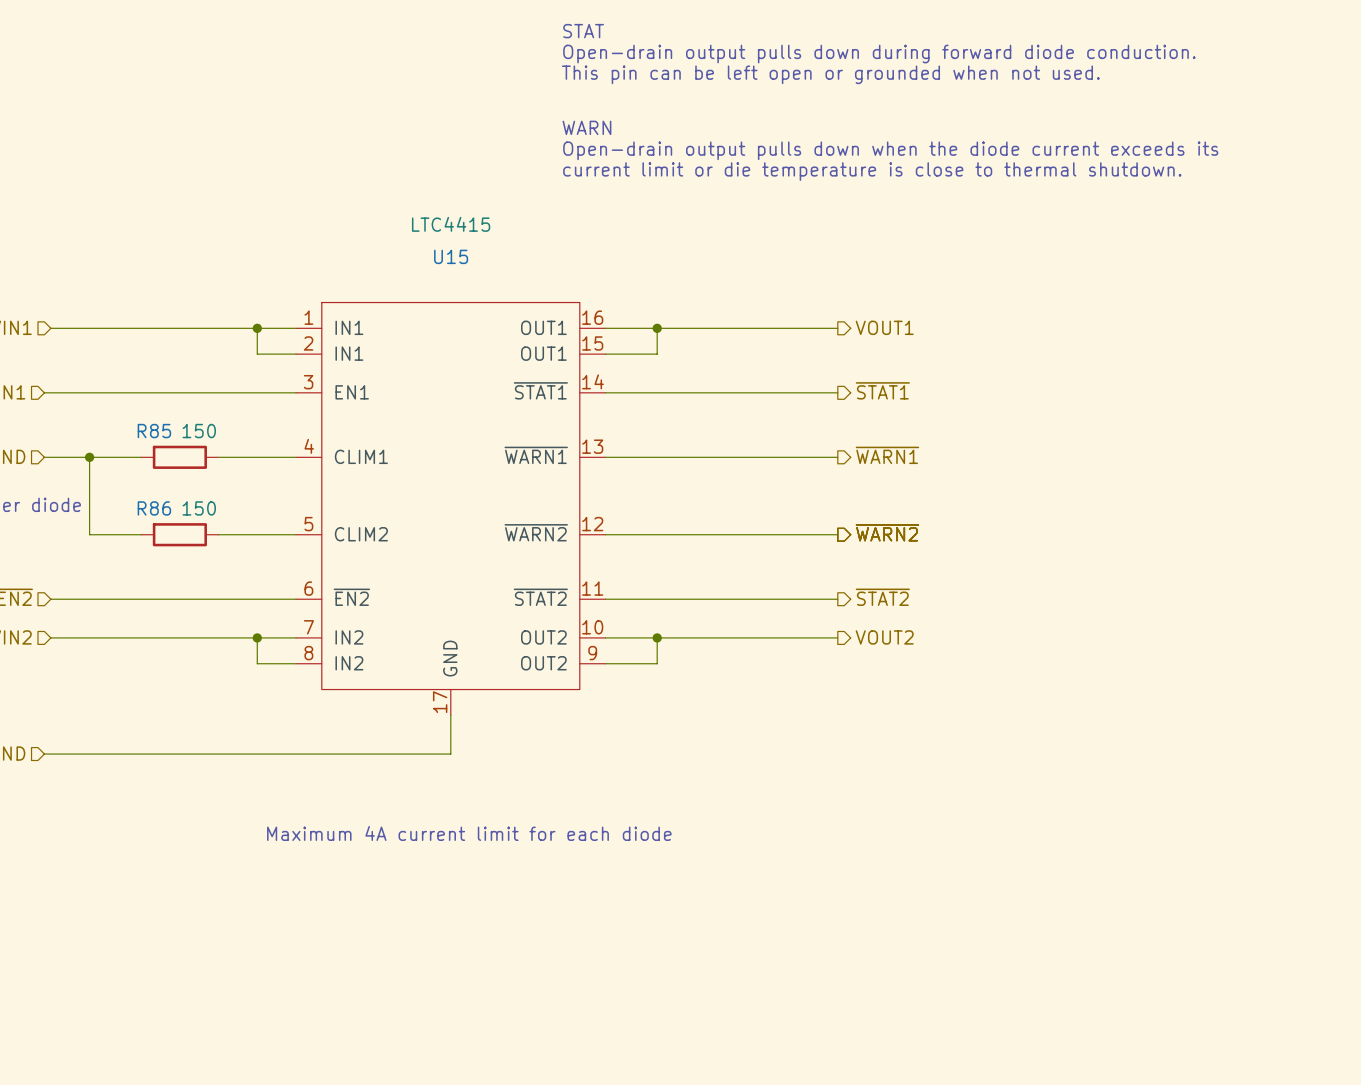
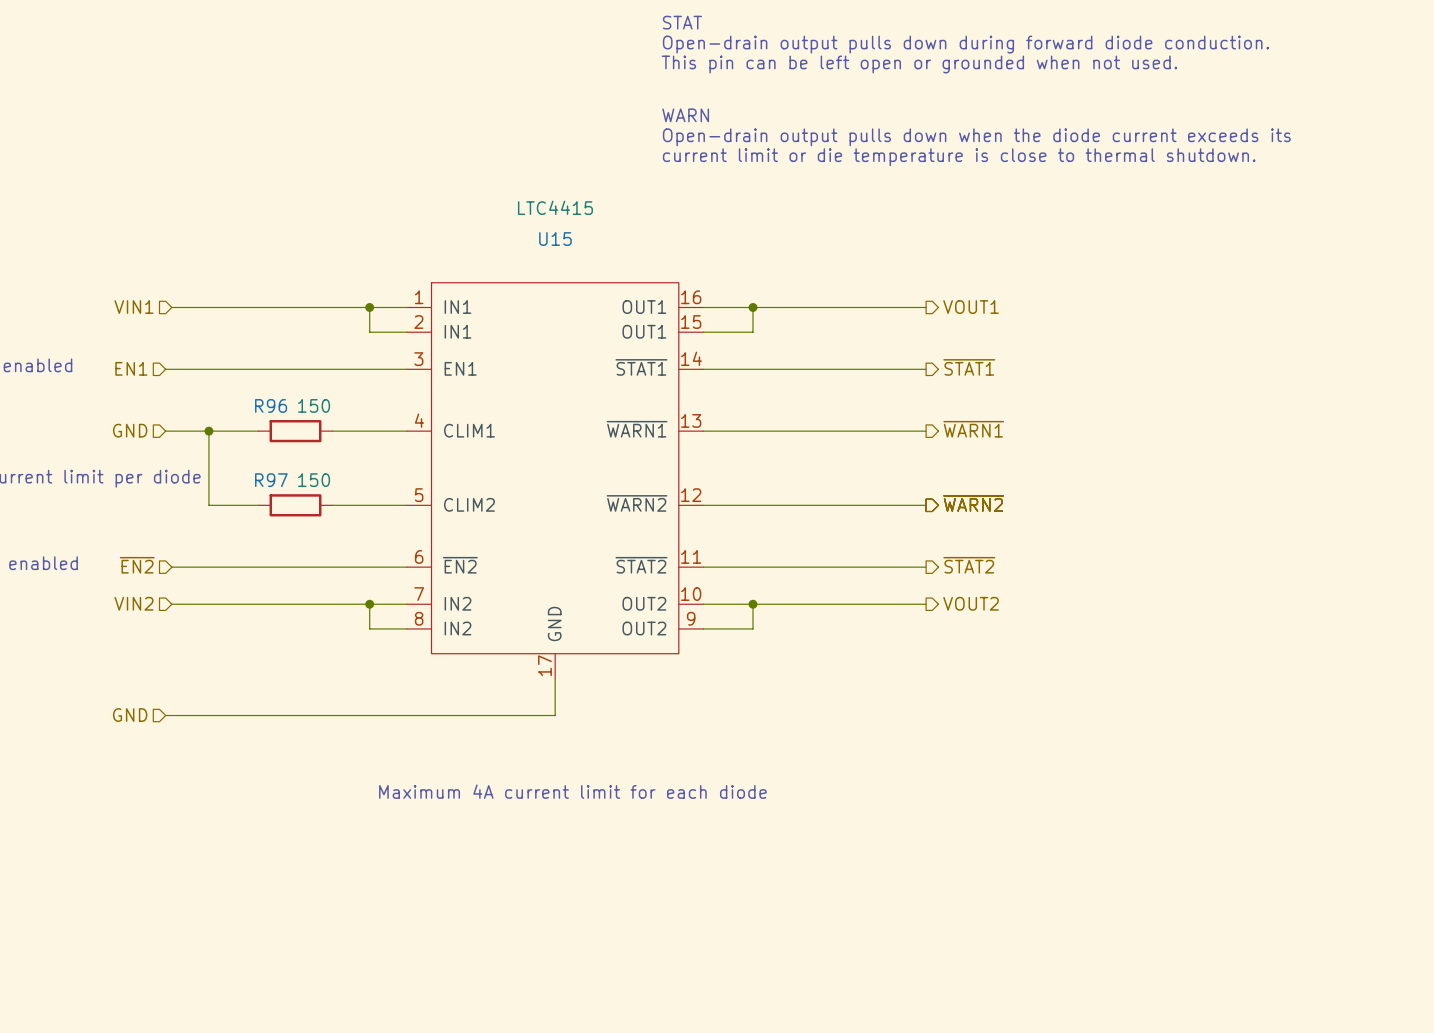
R85 name: R85 (154, 431) -> R96 (271, 405)
R86 name: R86 (154, 508) -> R97 (271, 480)

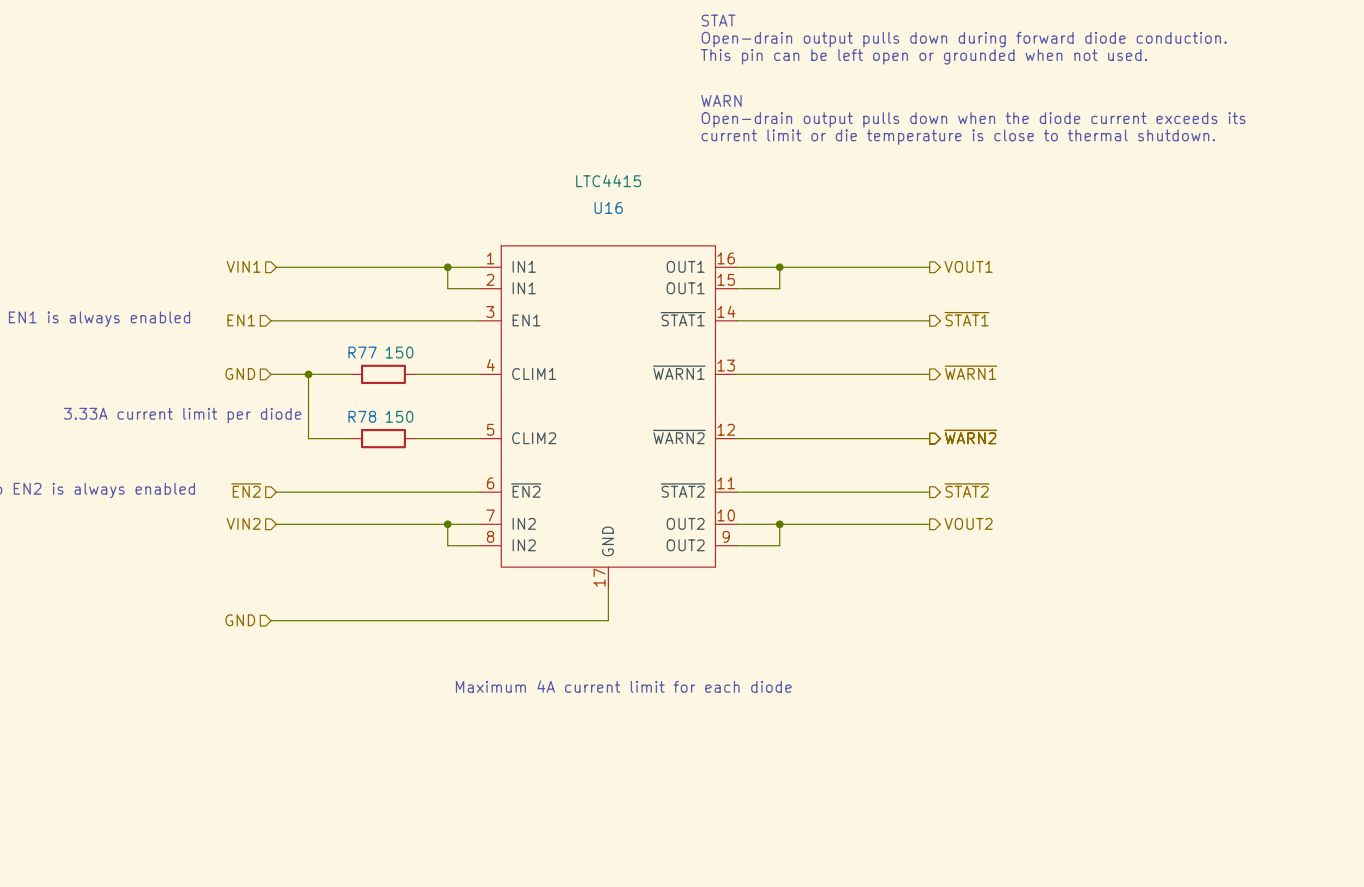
U15 name: U15 (555, 239) -> U16 (608, 207)
R96 name: R96 (271, 405) -> R77 (362, 352)
R97 name: R97 (271, 480) -> R78 (362, 416)

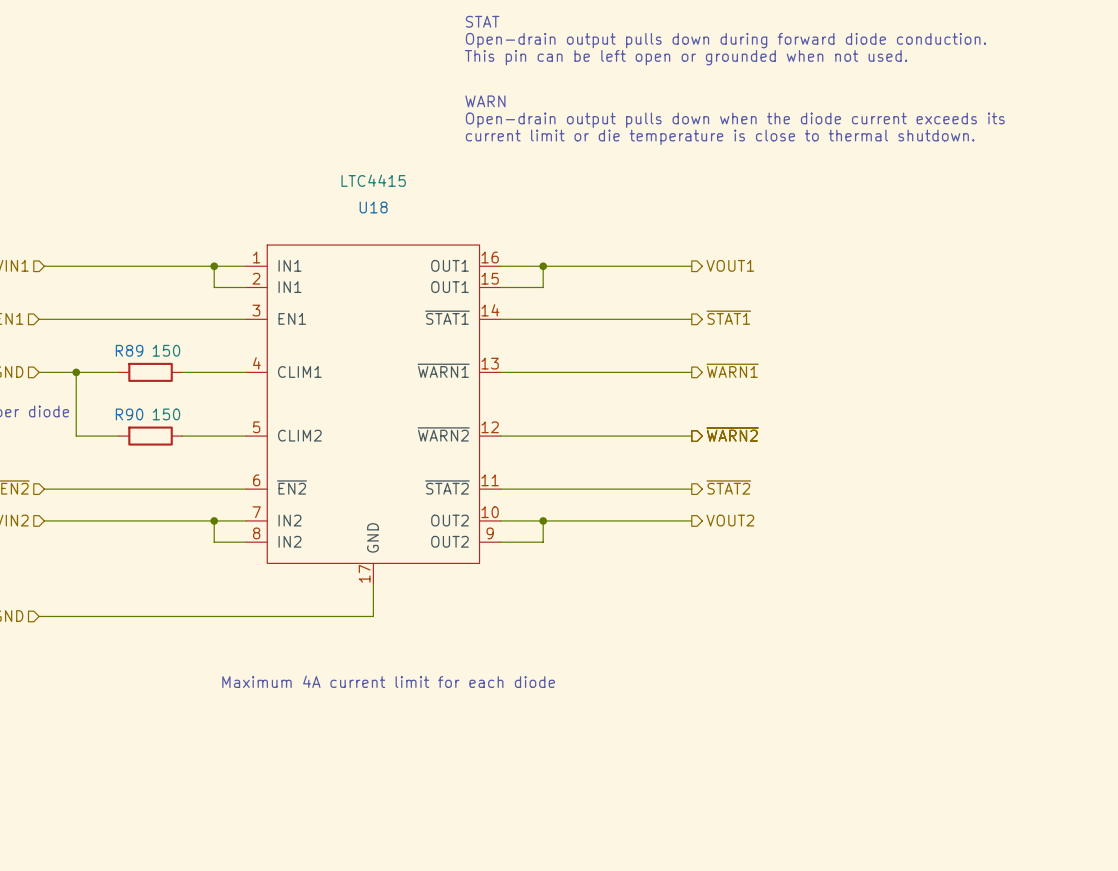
U16 name: U16 (608, 207) -> U18 (373, 207)
R77 name: R77 (362, 352) -> R89 (129, 350)
R78 name: R78 (362, 416) -> R90 (129, 414)

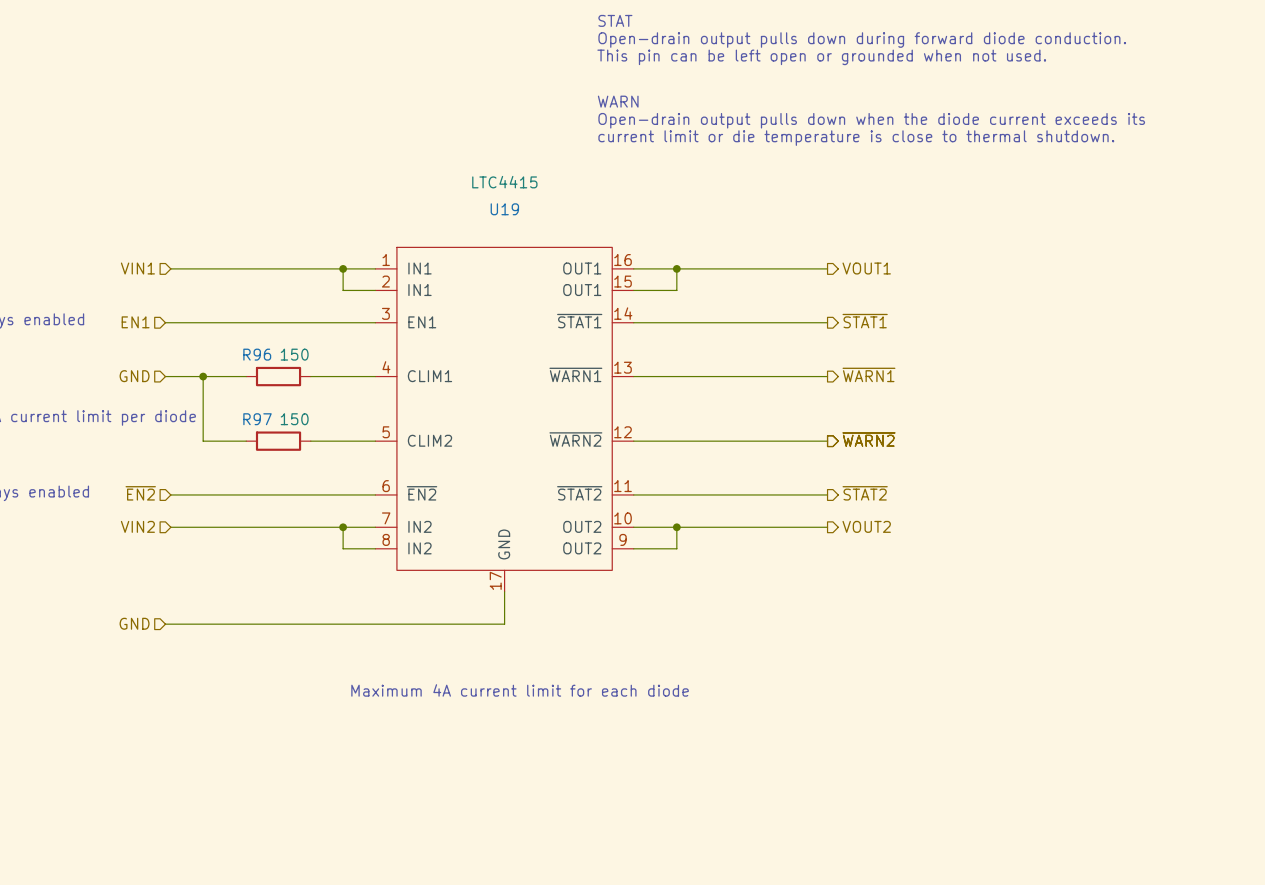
U18 name: U18 (373, 207) -> U19 (504, 209)
R89 name: R89 (129, 350) -> R96 (257, 354)
R90 name: R90 (129, 414) -> R97 (257, 419)

